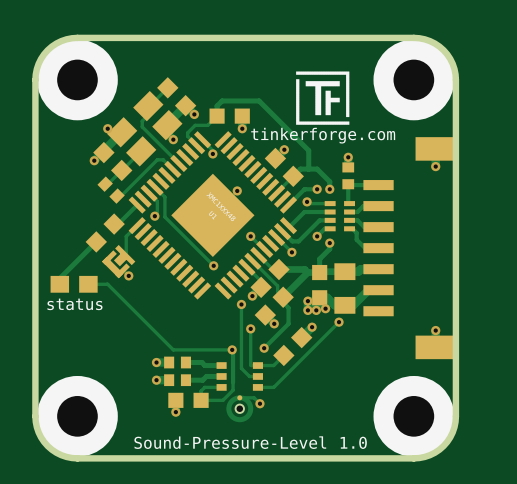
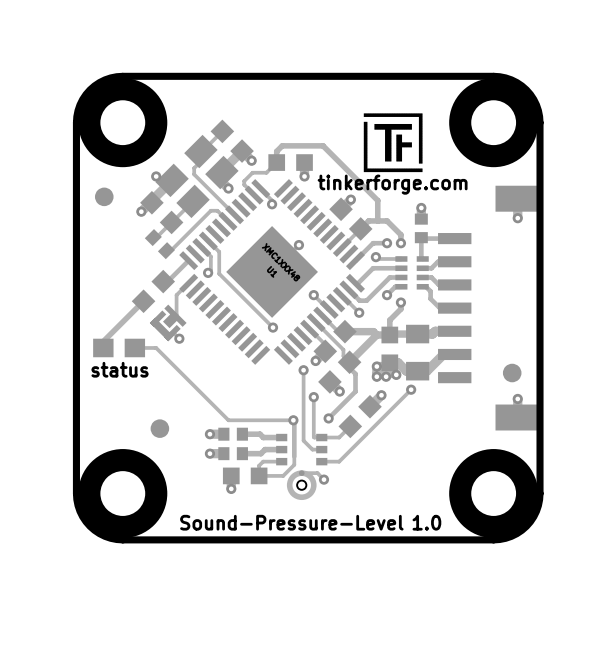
part: none -> (104, 196)
part: none -> (512, 373)
part: none -> (159, 428)

